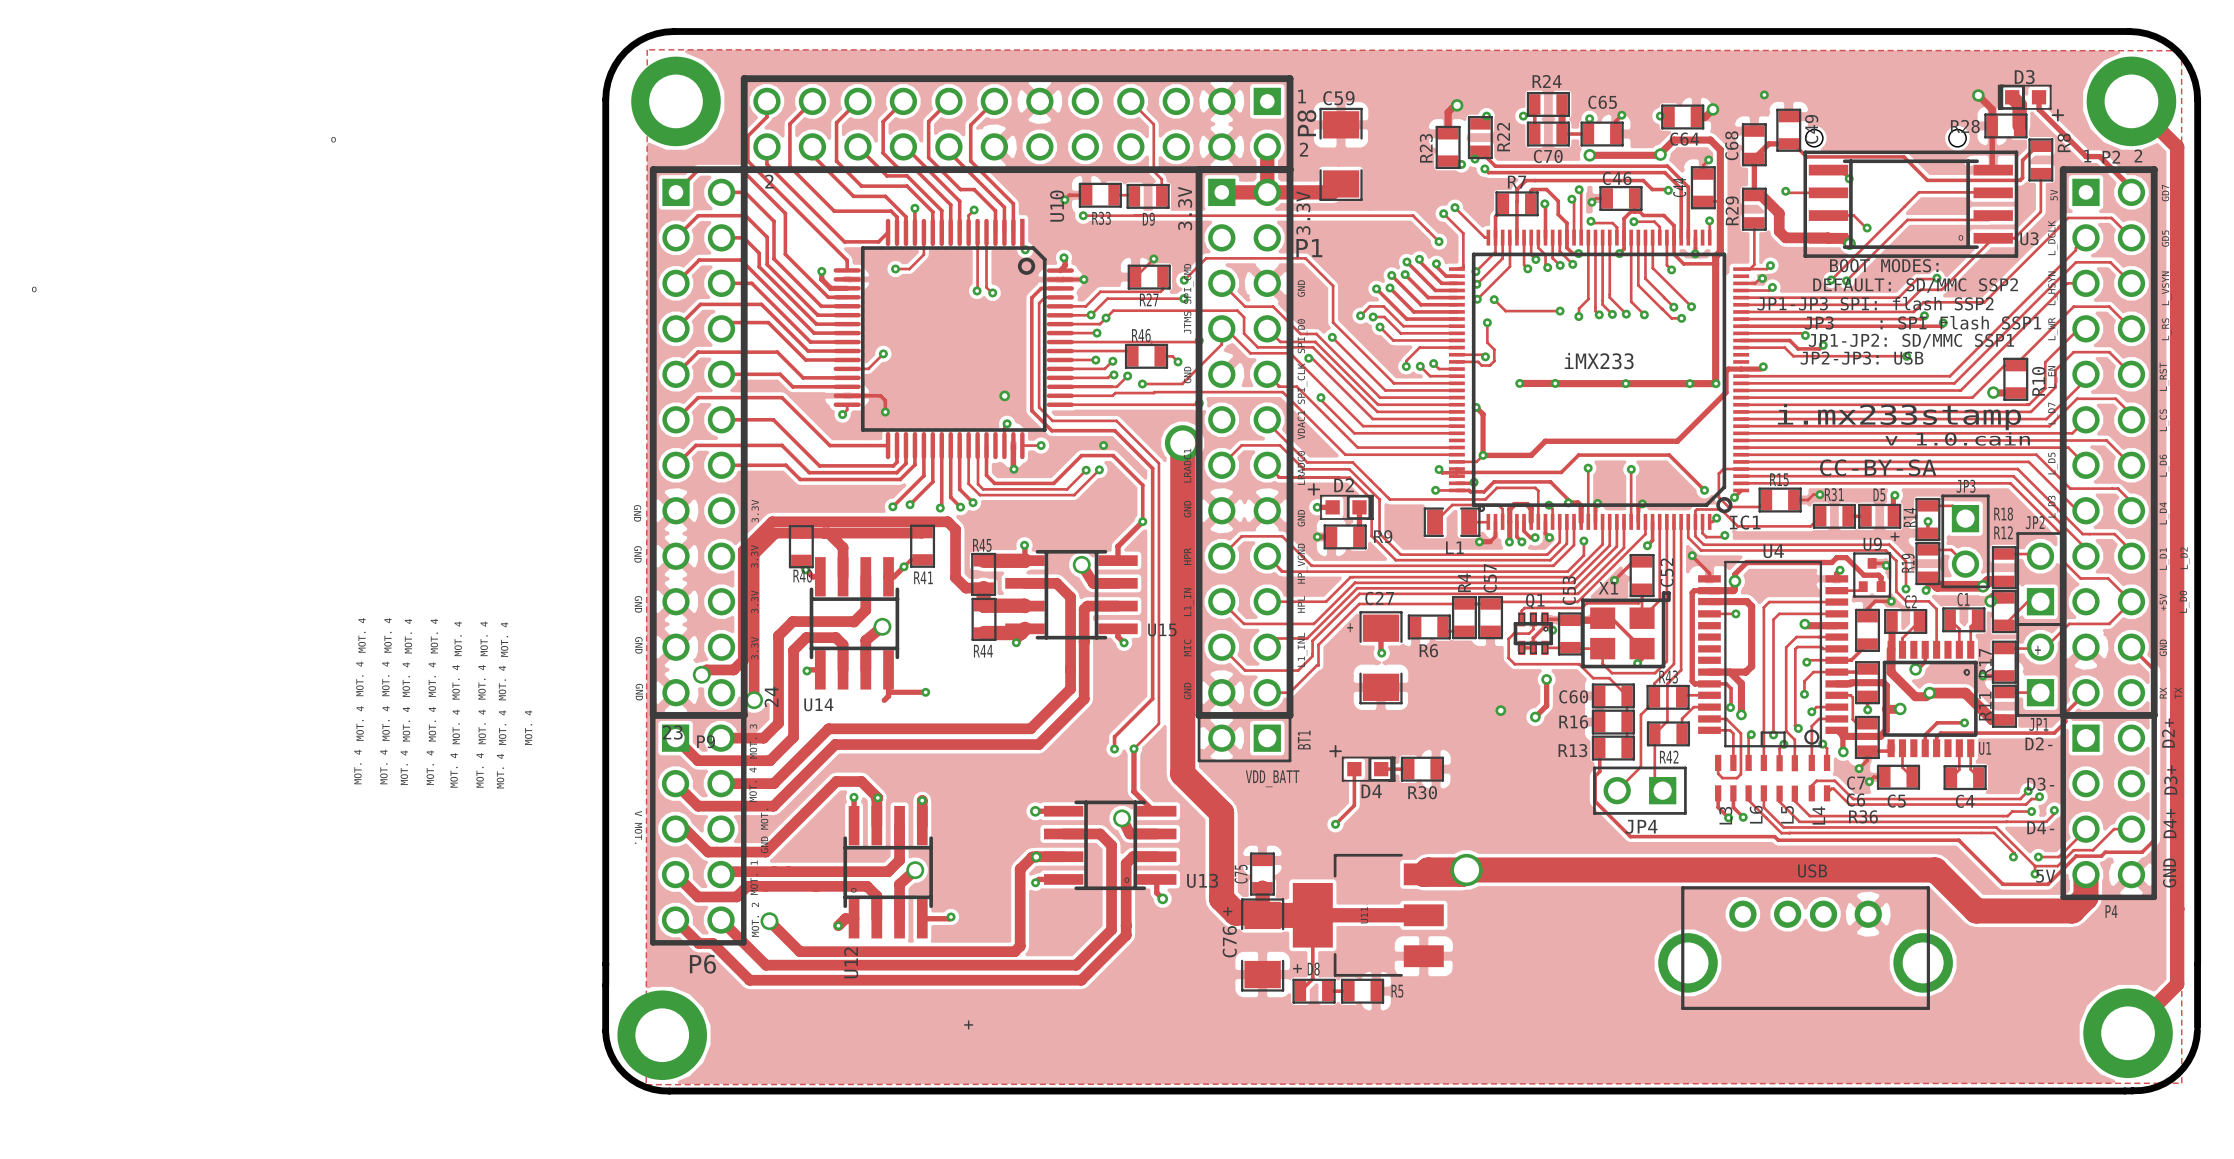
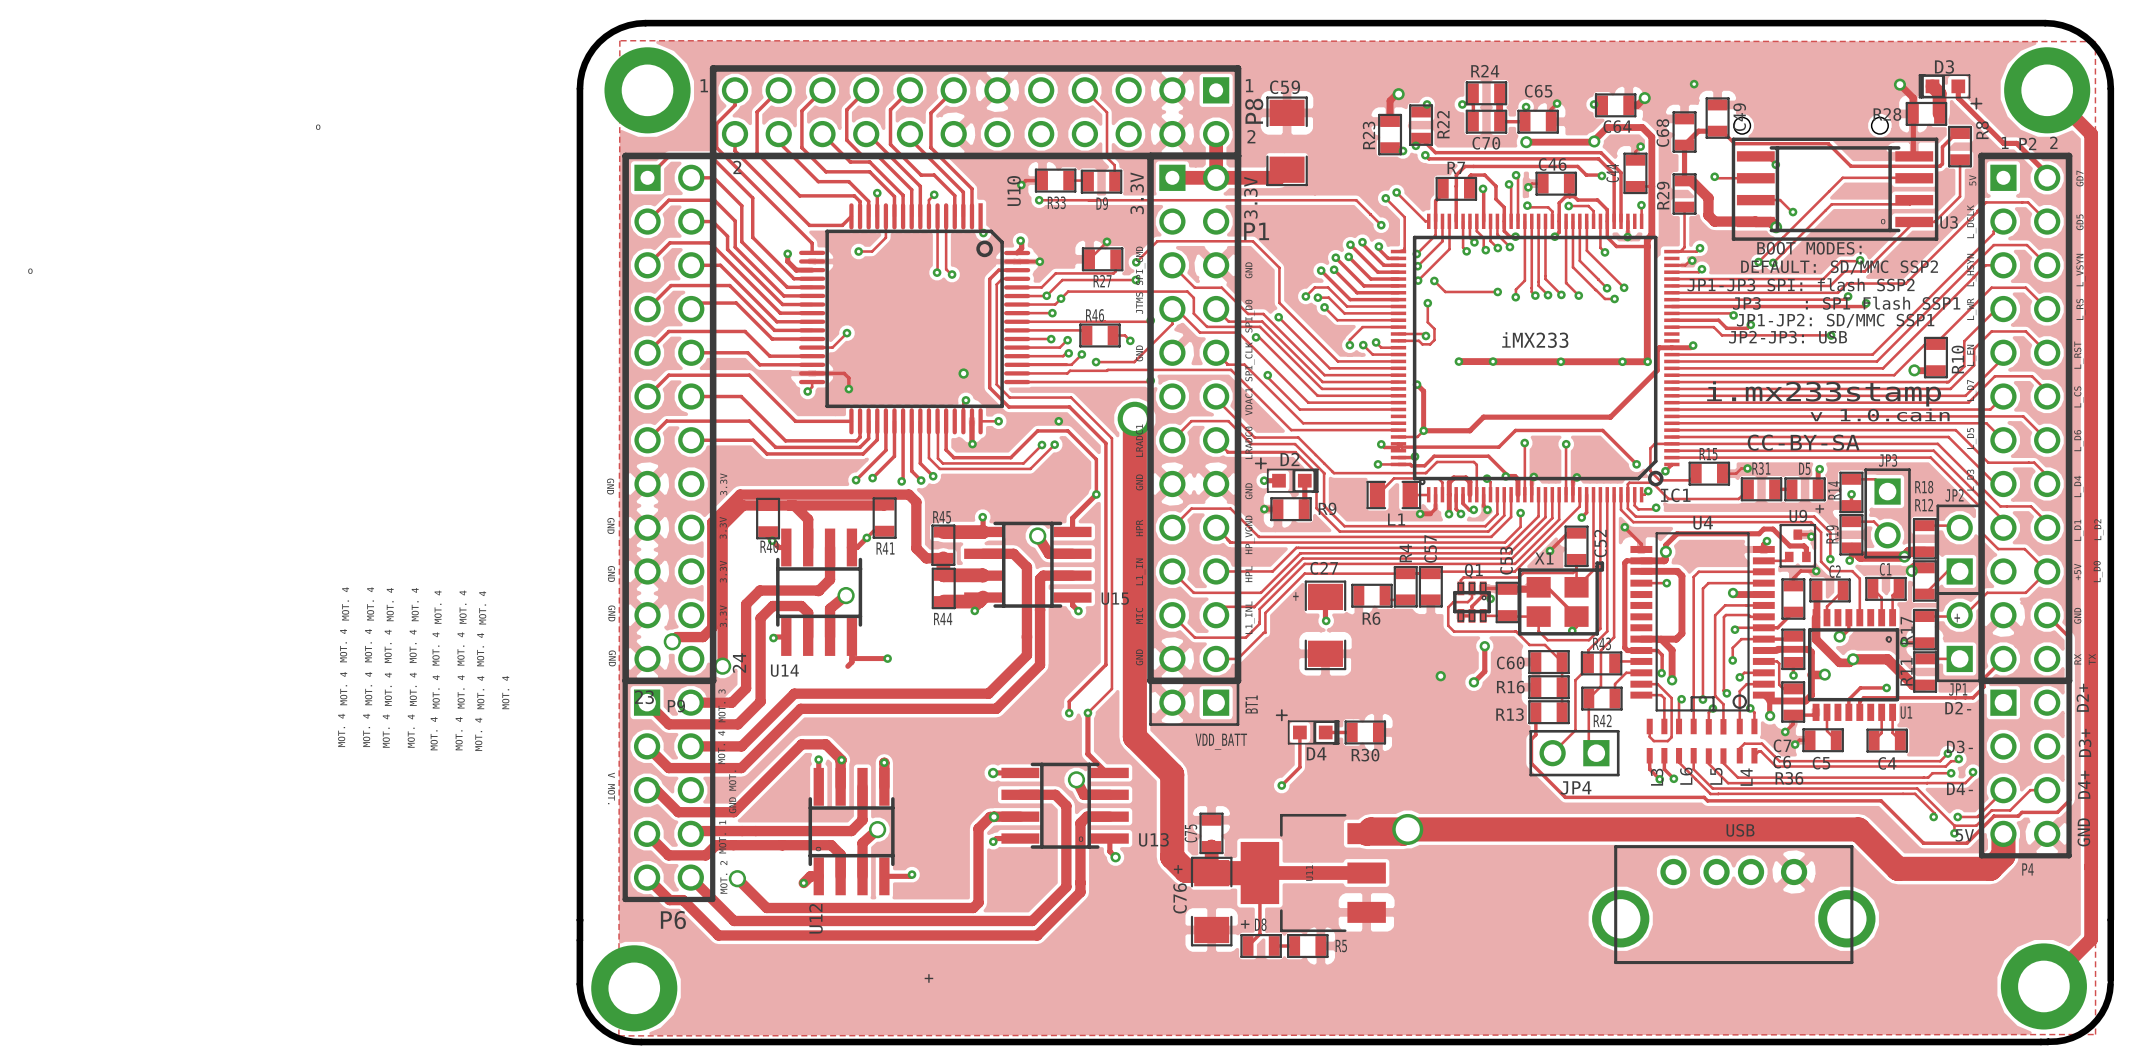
text: none -> 1 (704, 85)

